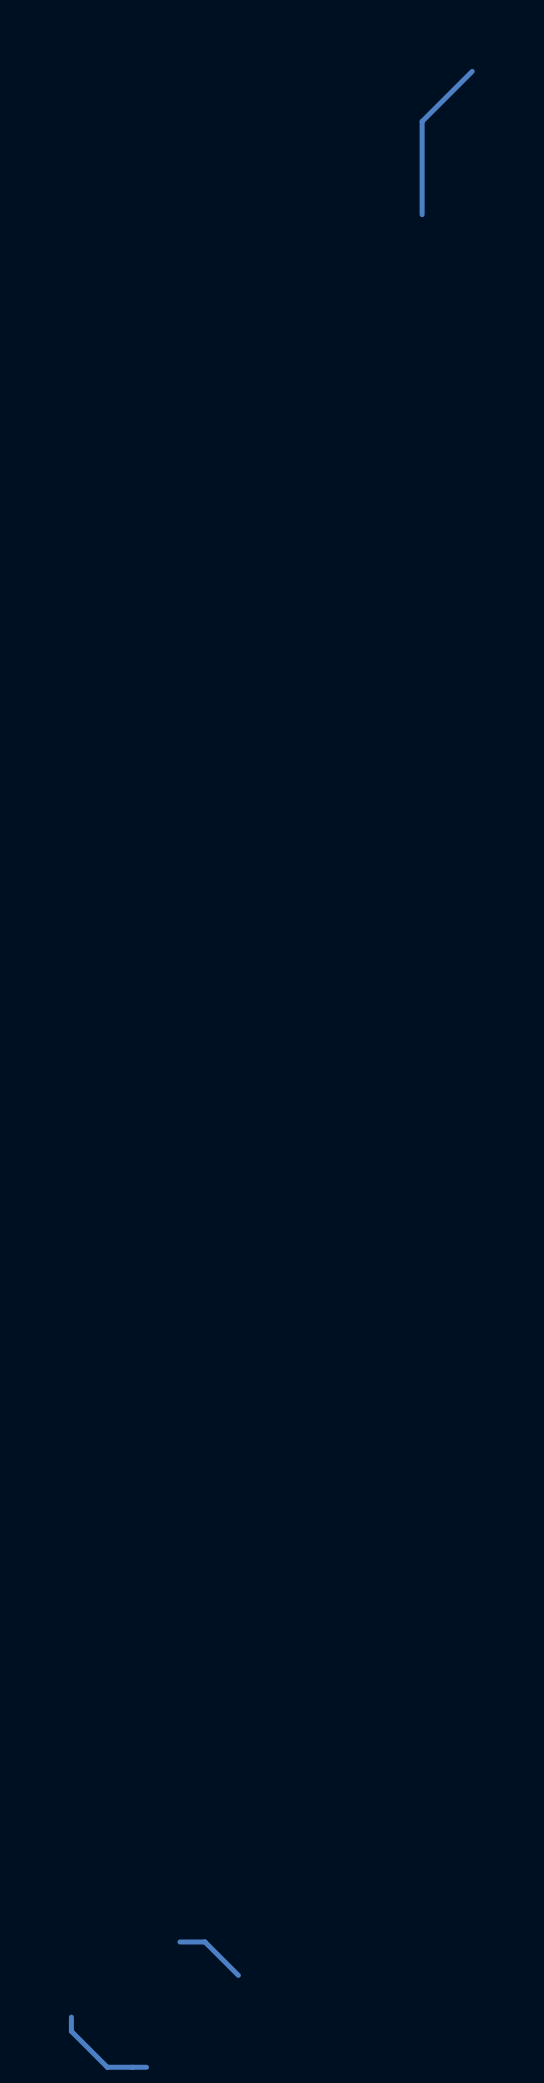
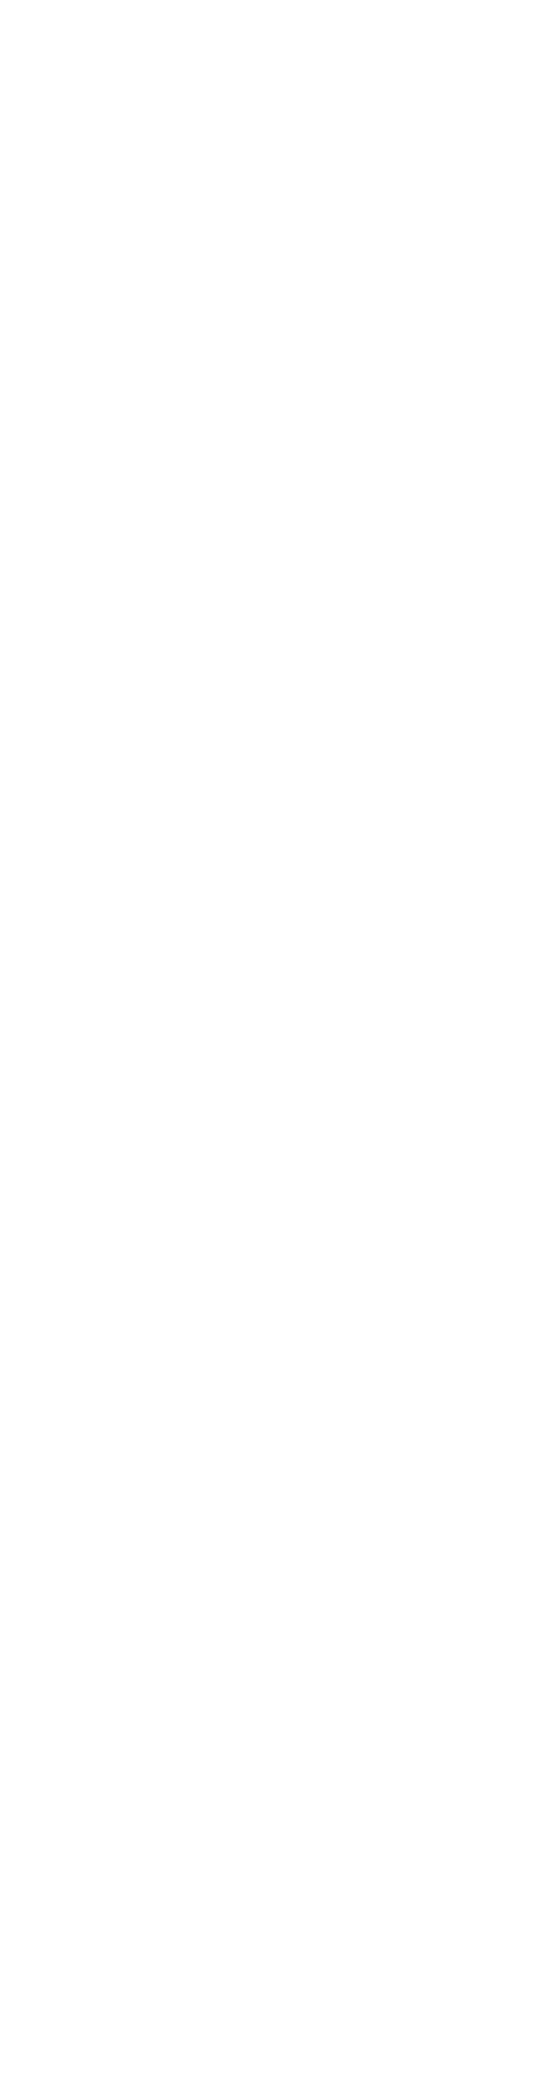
bottom track: (472, 71) (422, 121) (422, 214) -> none
bottom track: (179, 1941) (205, 1941) (238, 1975) -> none
bottom track: (71, 2017) (71, 2031) (107, 2067) (146, 2067) -> none

